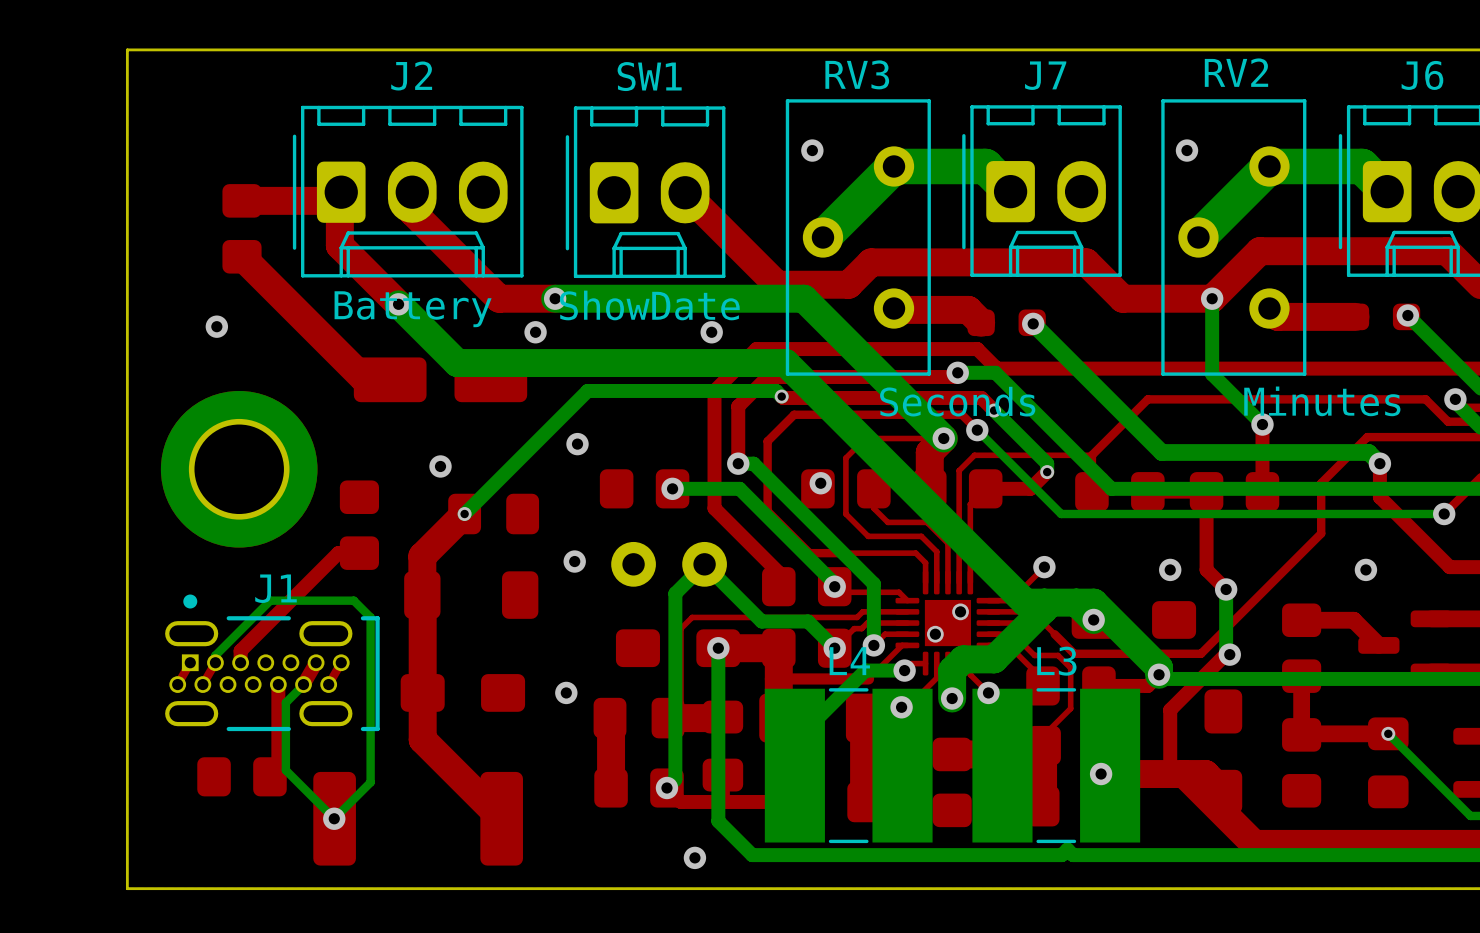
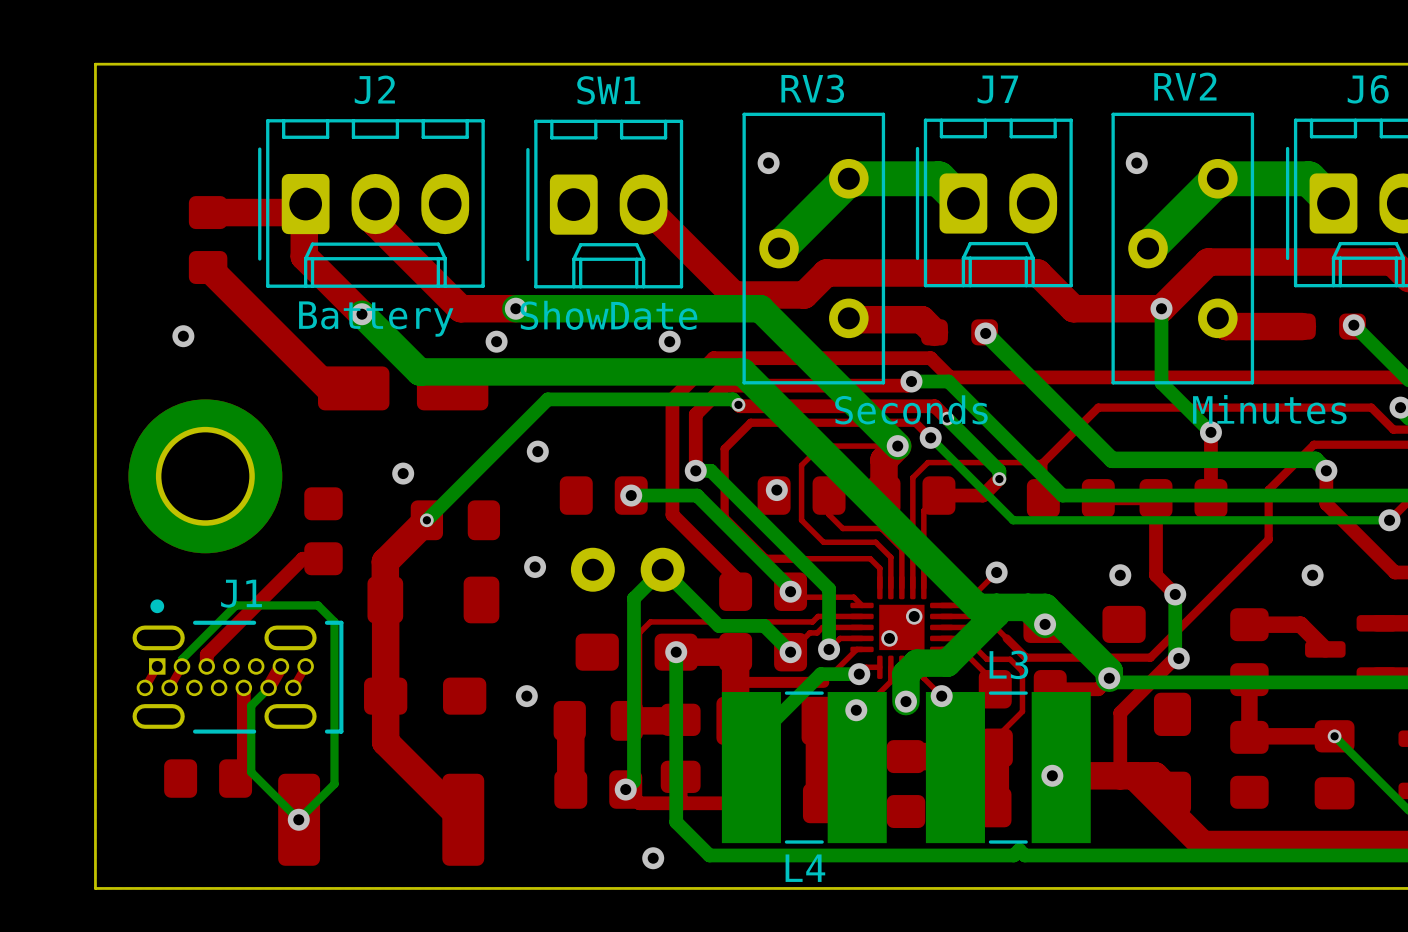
L4 name position: L4 (849, 661) -> L4 (805, 868)

